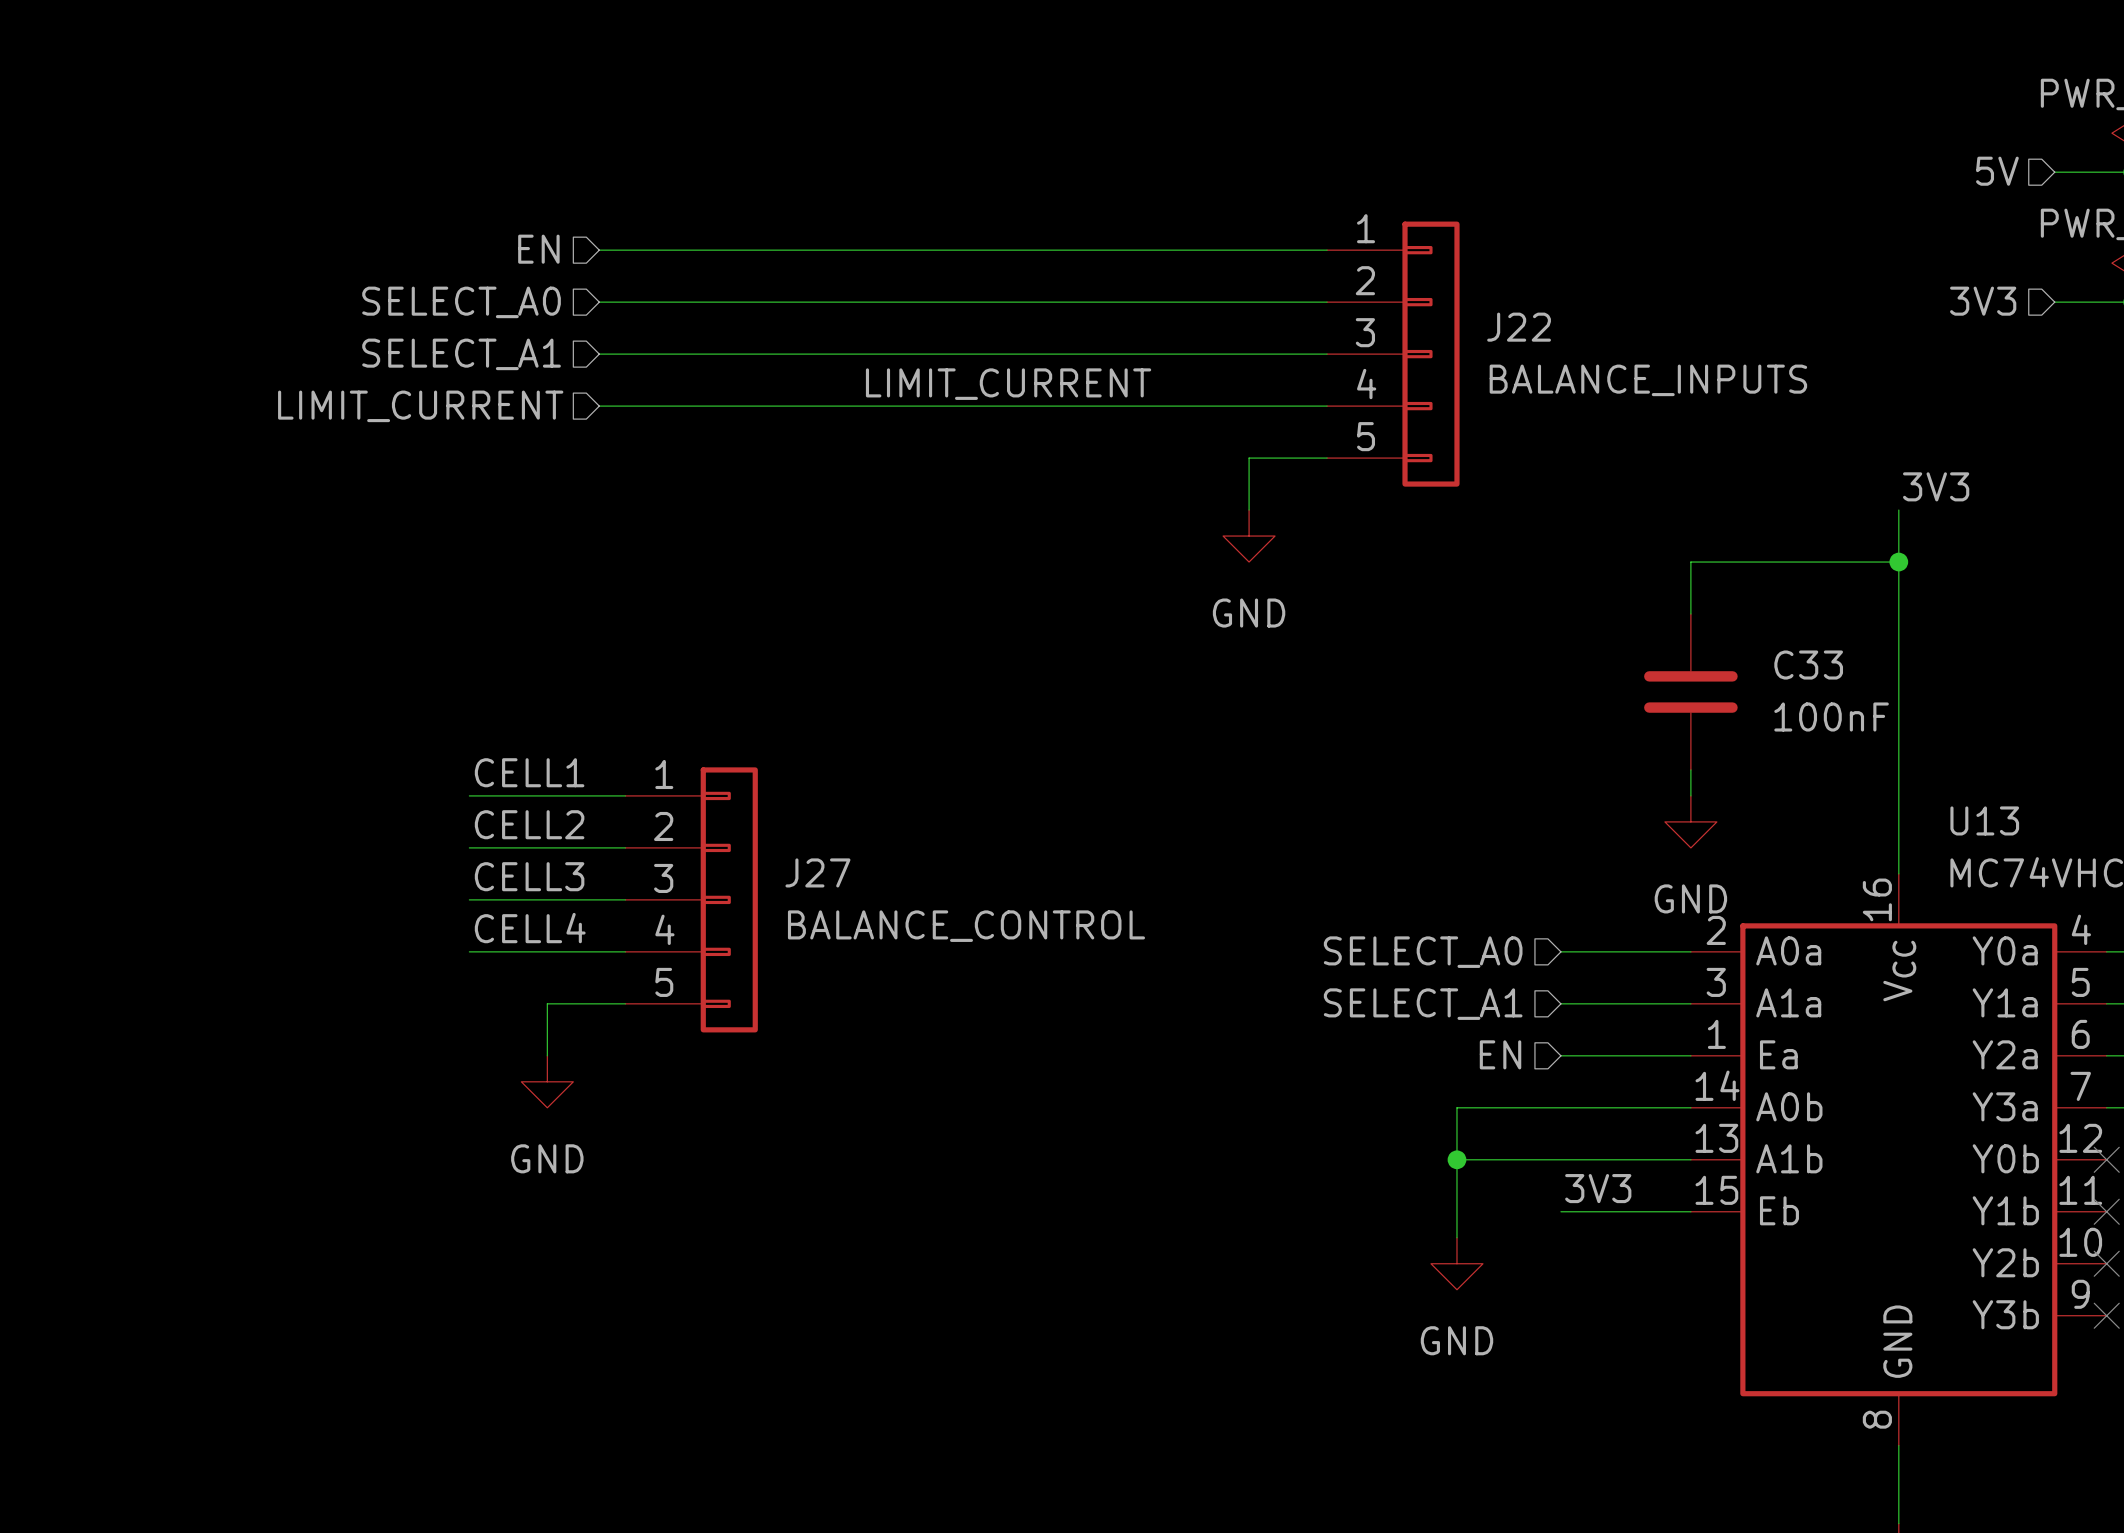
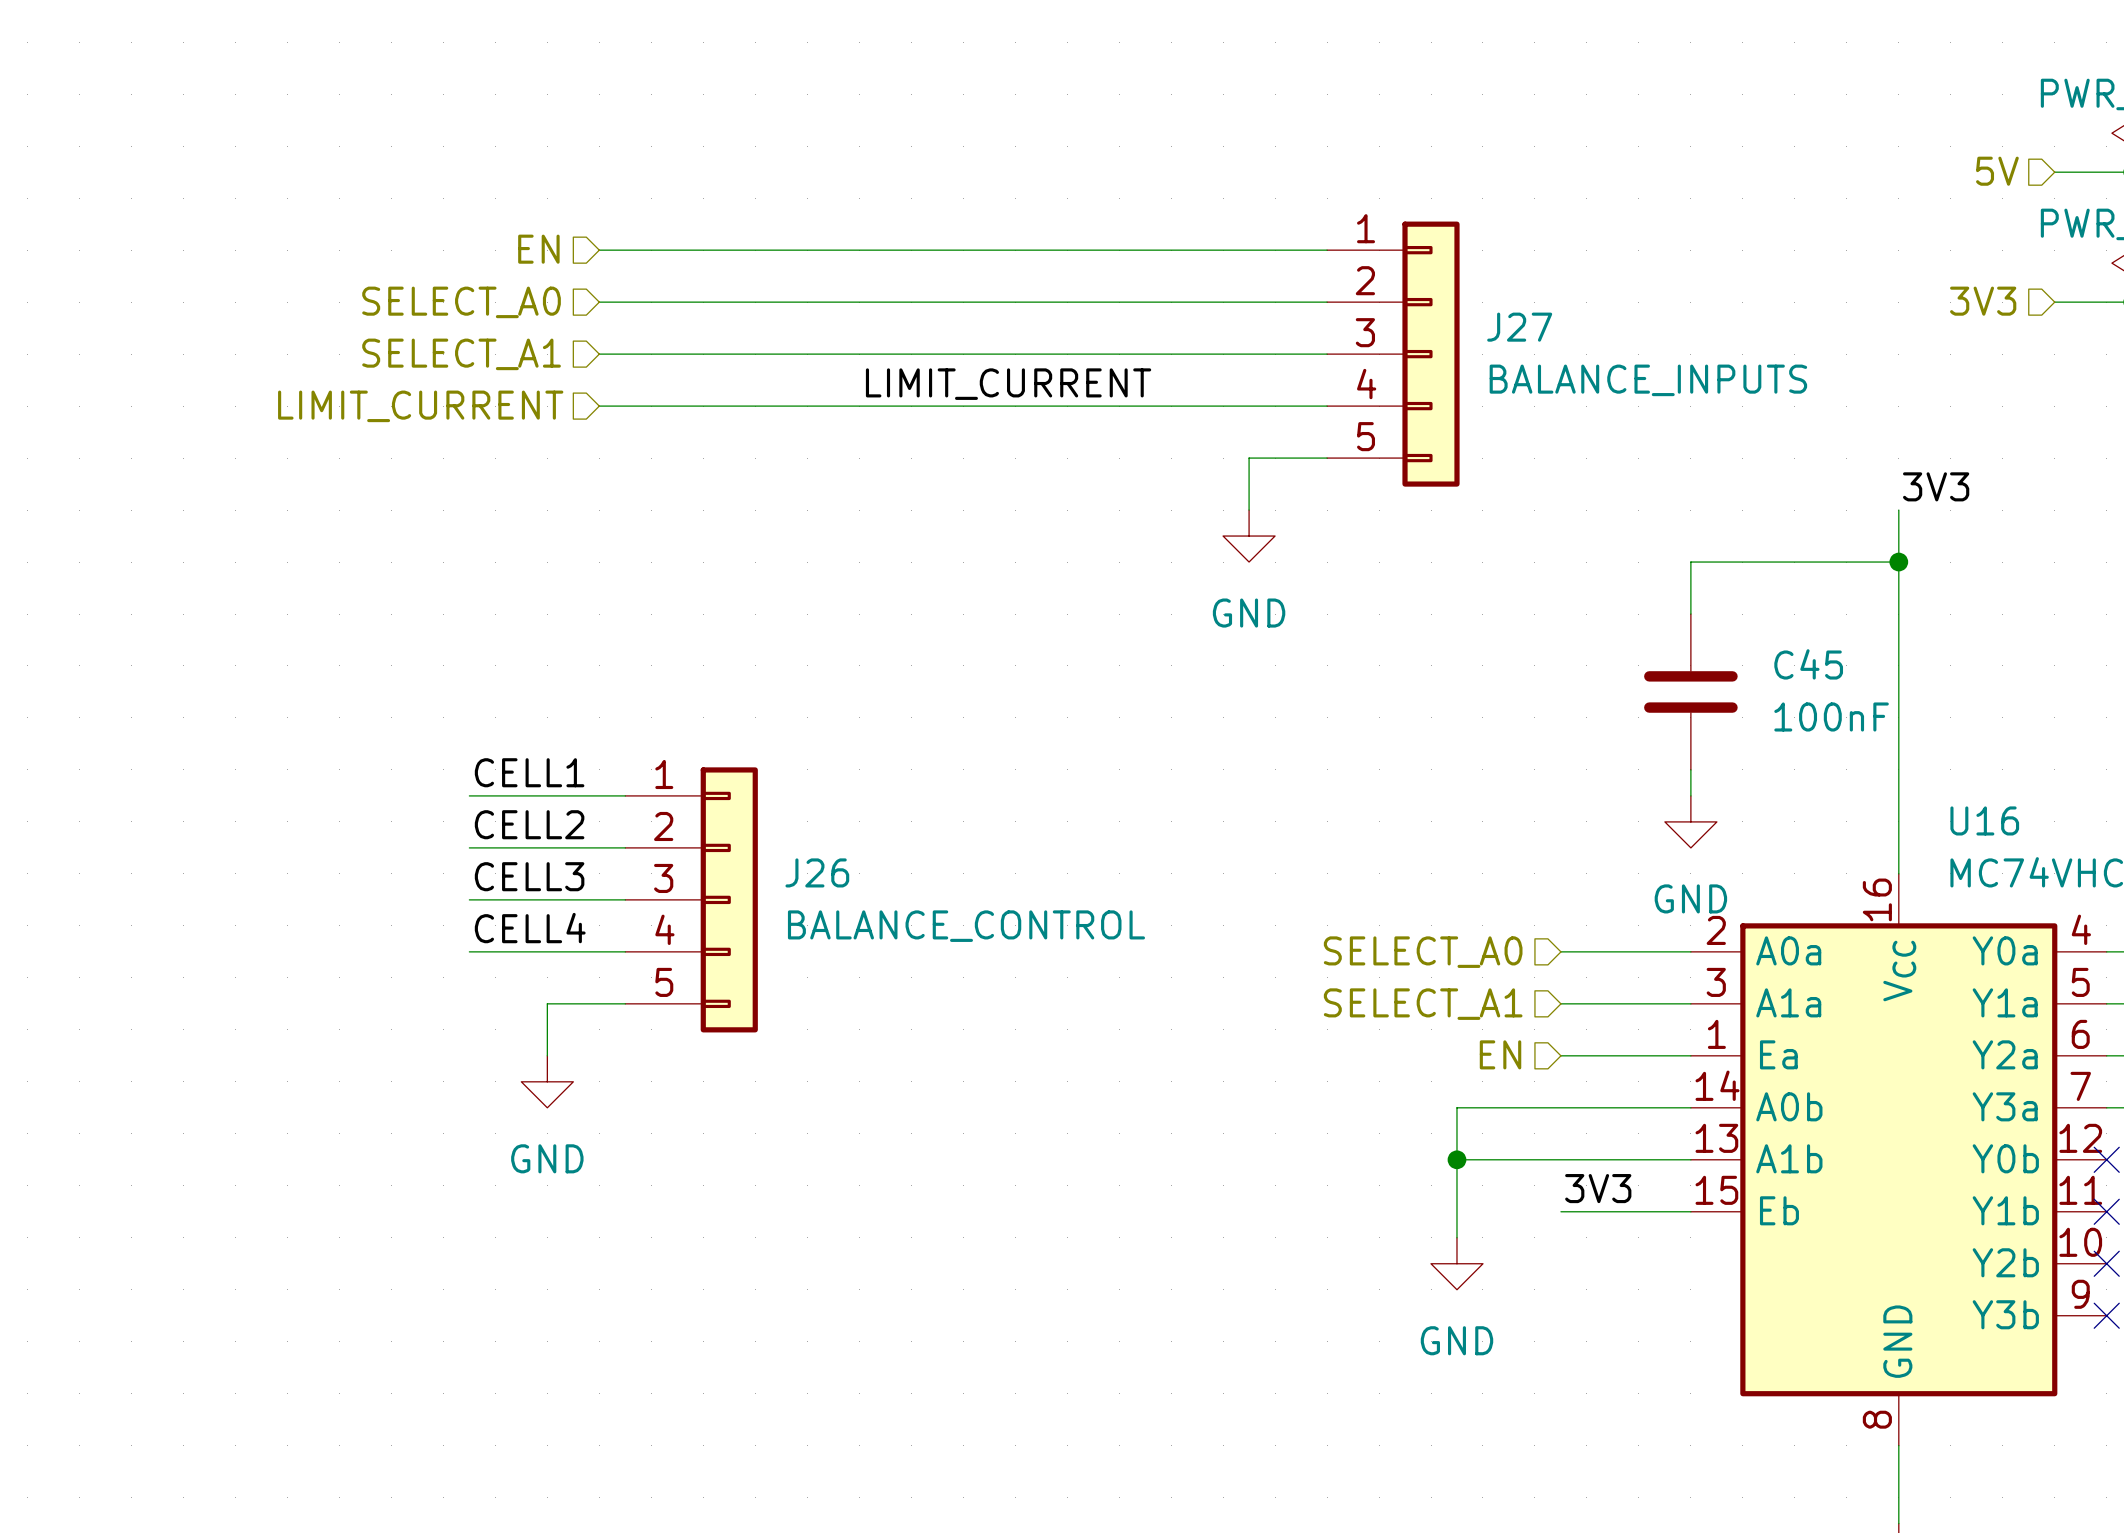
J22 name: J22 (1519, 327) -> J27 (1519, 327)
C33 name: C33 (1808, 665) -> C45 (1808, 664)
U13 name: U13 (1984, 820) -> U16 (1984, 820)
J27 name: J27 (817, 872) -> J26 (817, 872)

